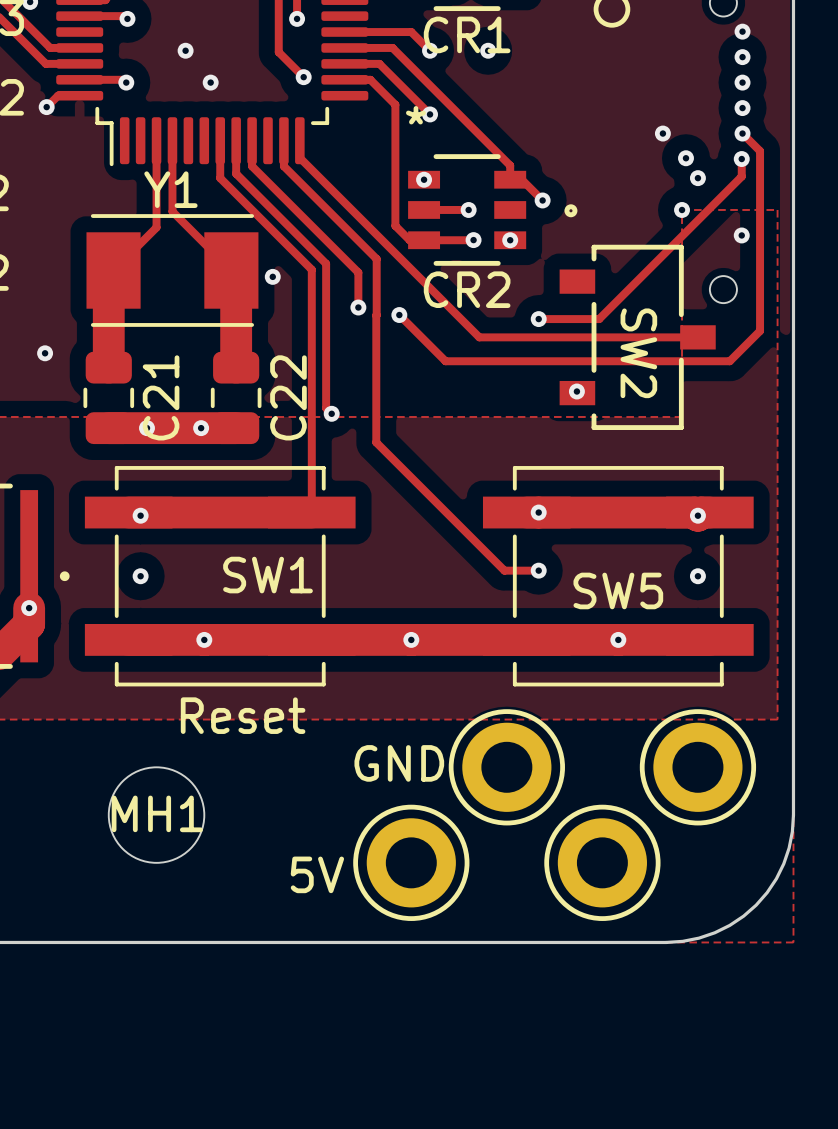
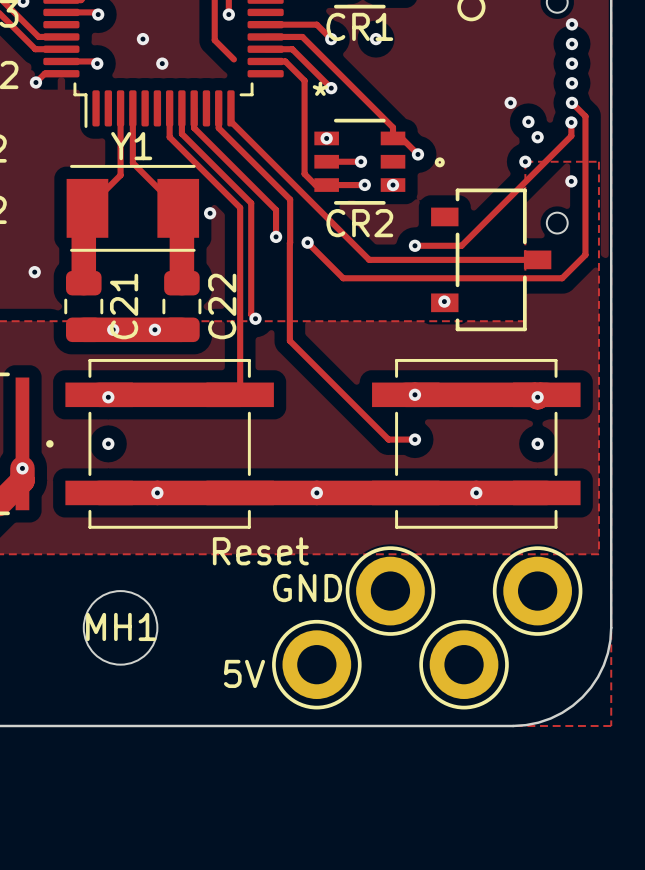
via: (303, 77) -> none
SW2 name: SW2 (638, 353) -> none
SW1 name: SW1 (268, 575) -> none
SW5 name: SW5 (618, 590) -> none
text position: Reset (243, 715) -> Reset (260, 551)

